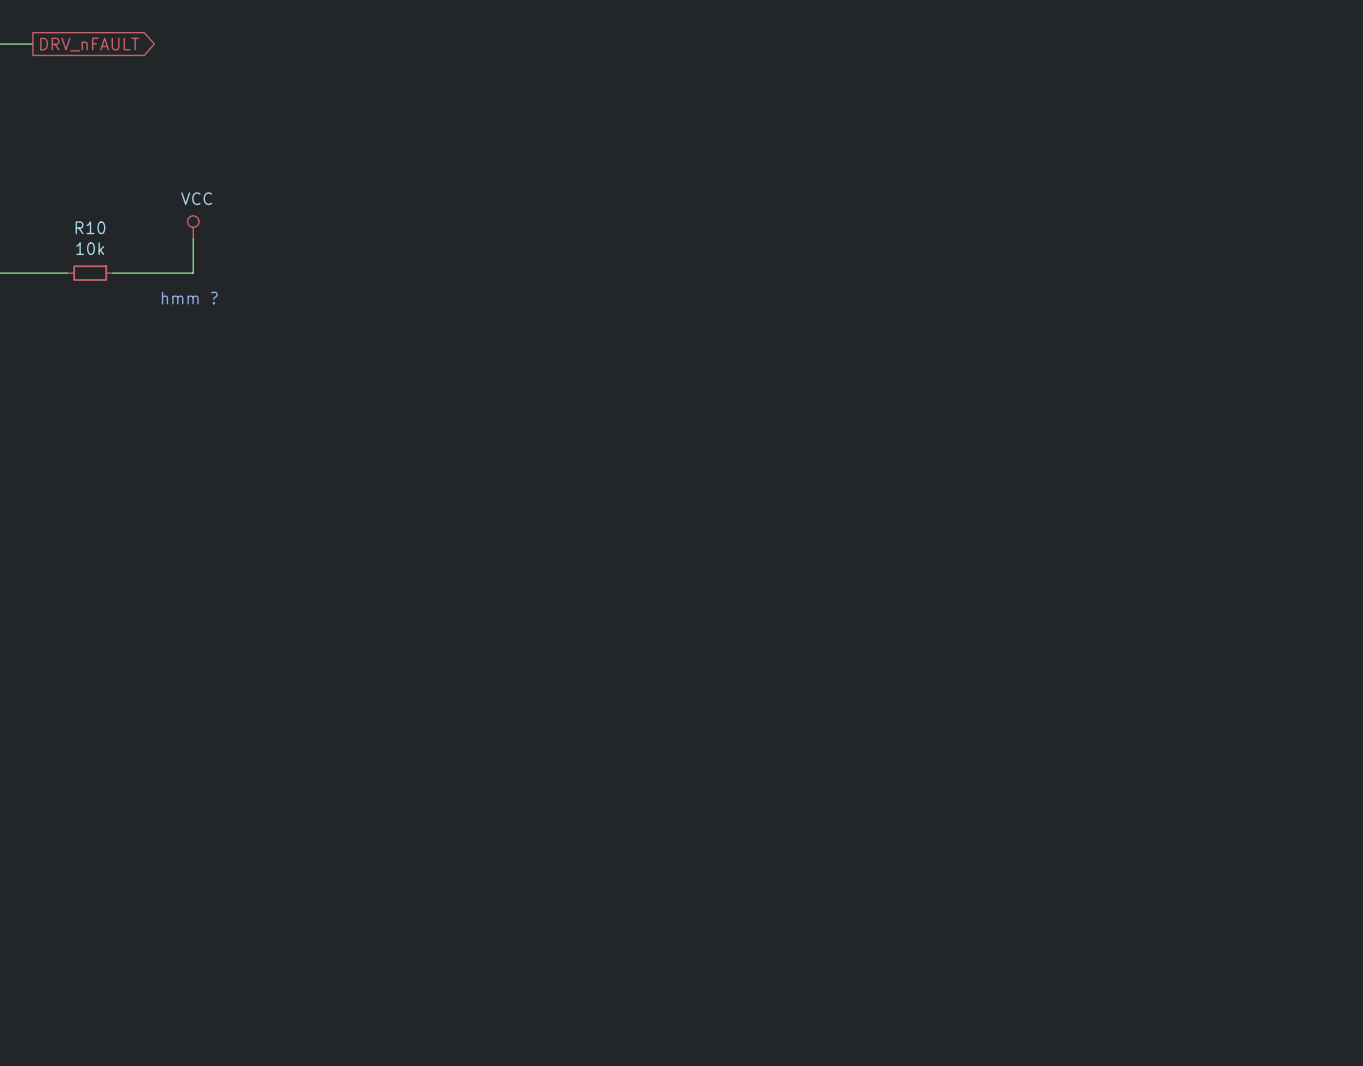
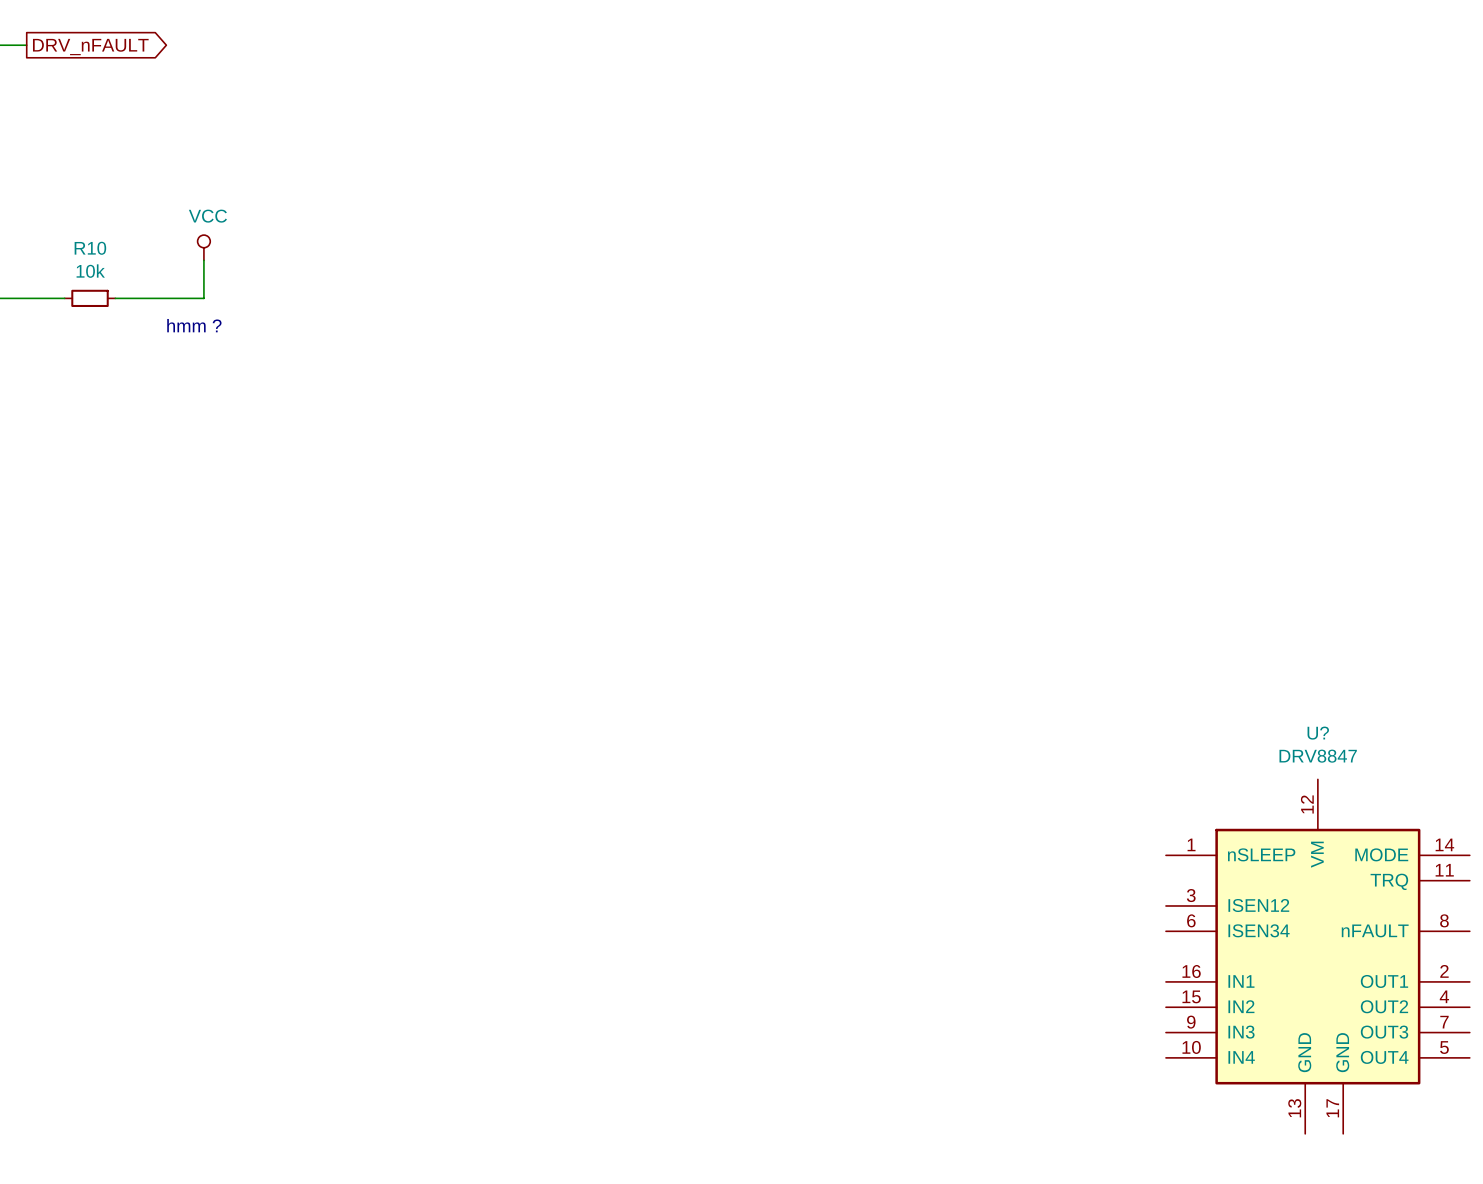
U?: none -> DRV8847 (1317, 956)

